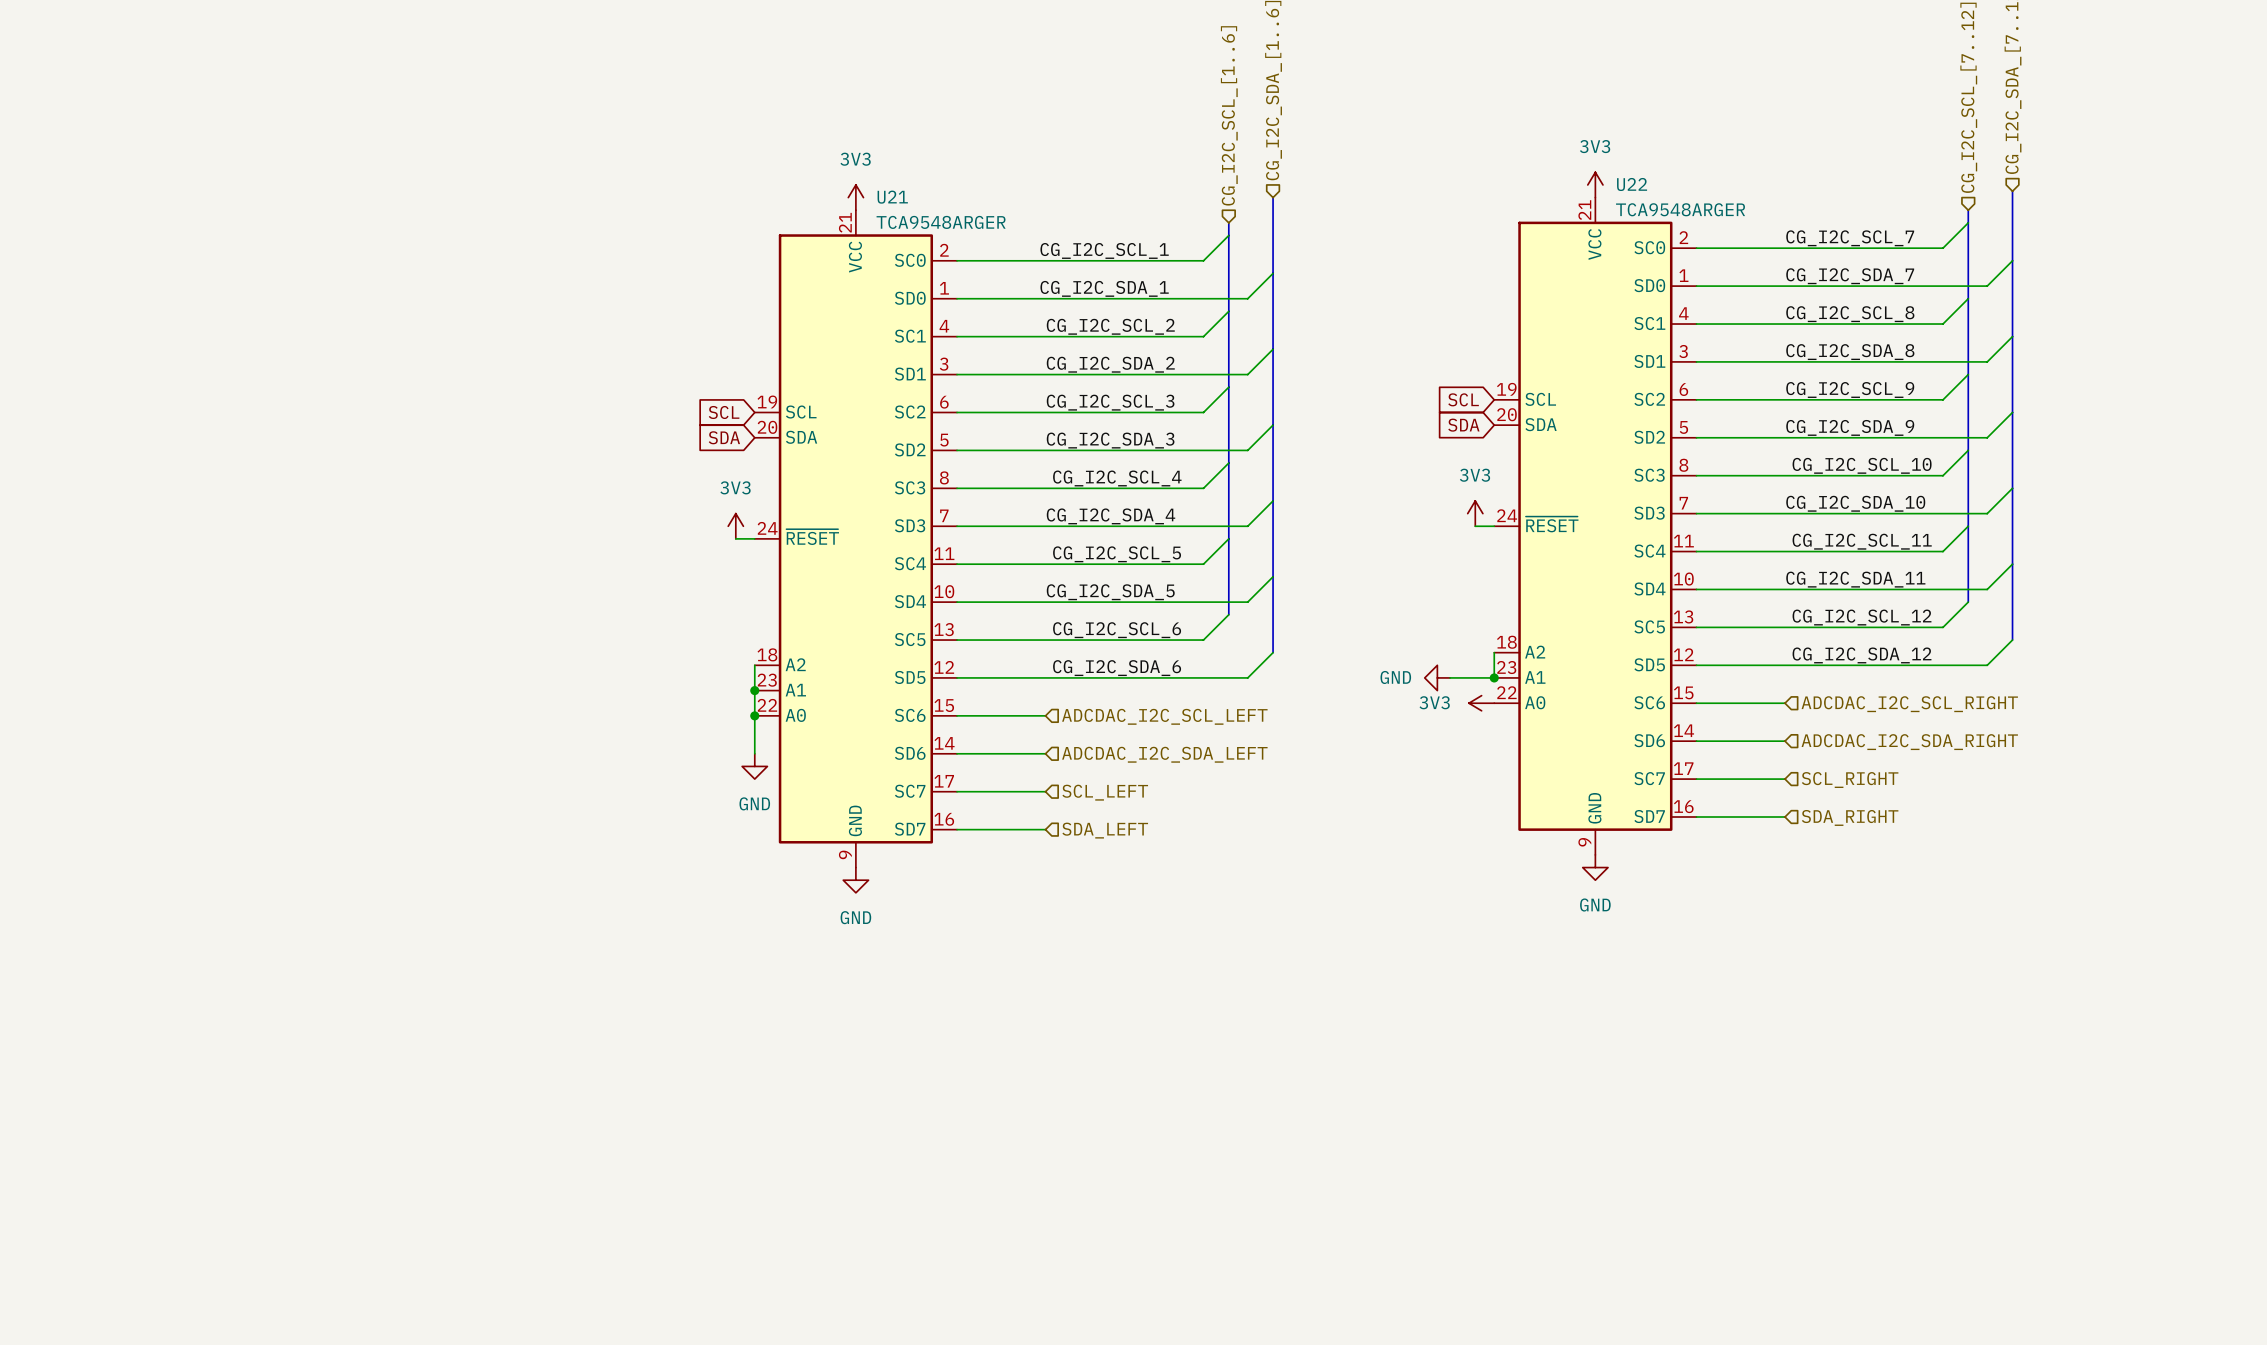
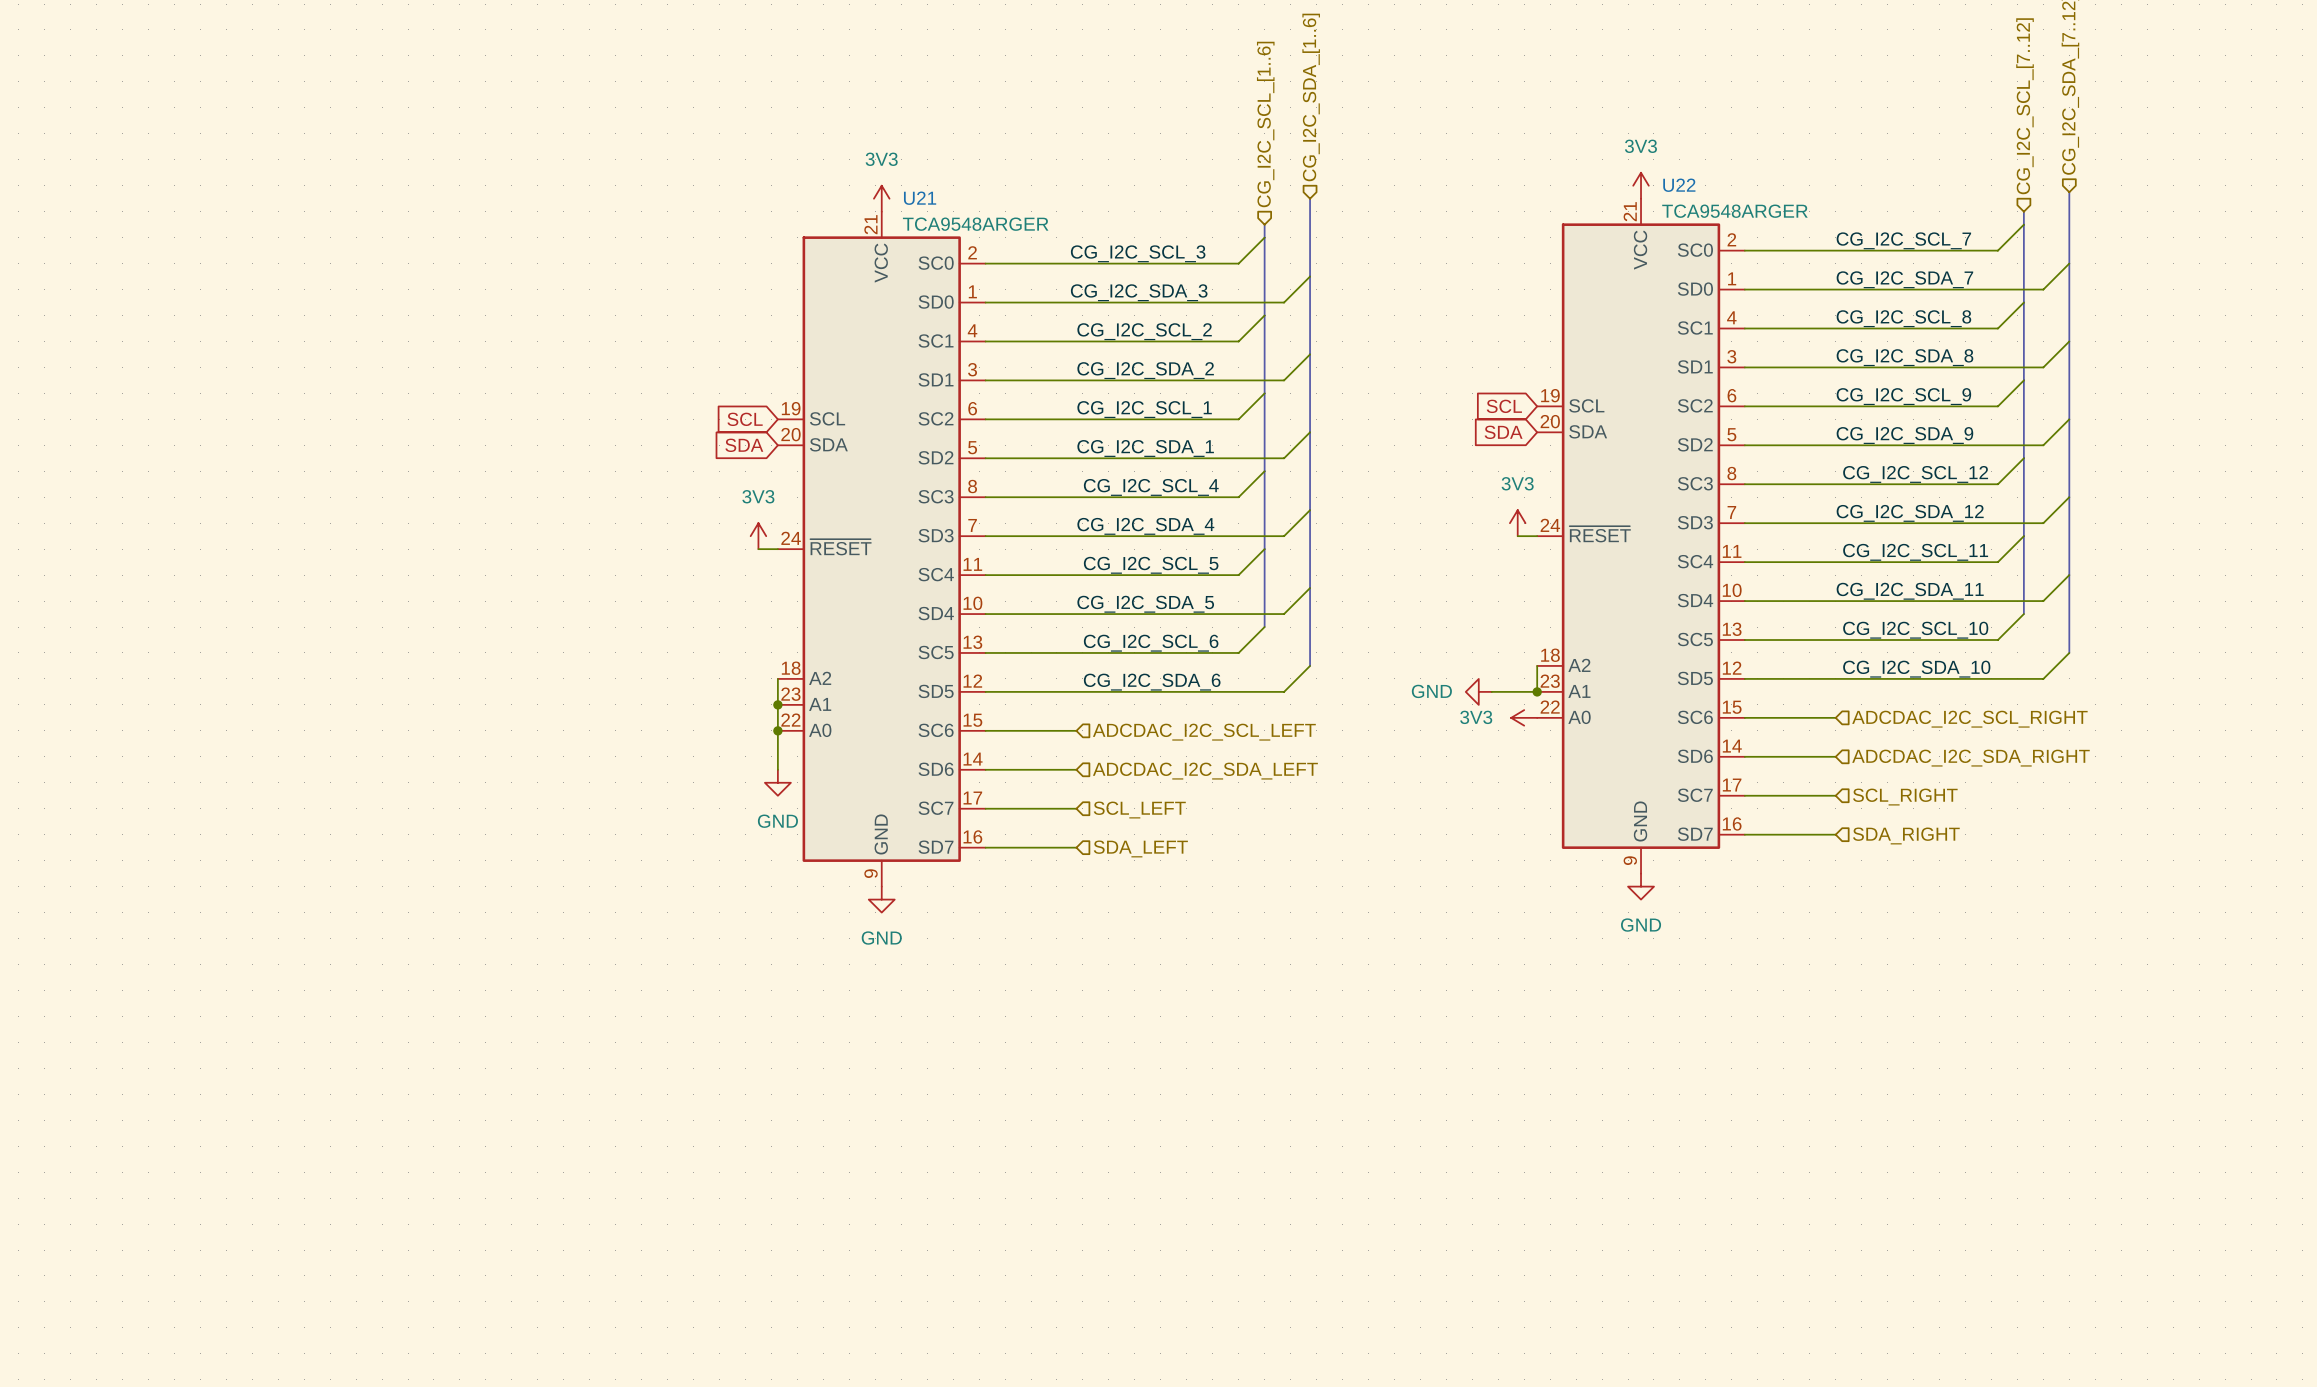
label: CG_I2C_SCL_1 (1104, 250) -> CG_I2C_SCL_3 (1138, 253)
label: CG_I2C_SDA_1 (1104, 288) -> CG_I2C_SDA_3 (1139, 292)
label: CG_I2C_SCL_3 (1110, 402) -> CG_I2C_SCL_1 (1144, 409)
label: CG_I2C_SDA_3 (1110, 440) -> CG_I2C_SDA_1 (1145, 448)
label: CG_I2C_SCL_10 (1862, 465) -> CG_I2C_SCL_12 (1915, 474)
label: CG_I2C_SDA_10 (1855, 503) -> CG_I2C_SDA_12 (1910, 513)
label: CG_I2C_SCL_12 (1862, 617) -> CG_I2C_SCL_10 (1915, 630)
label: CG_I2C_SDA_12 (1862, 655) -> CG_I2C_SDA_10 (1916, 669)

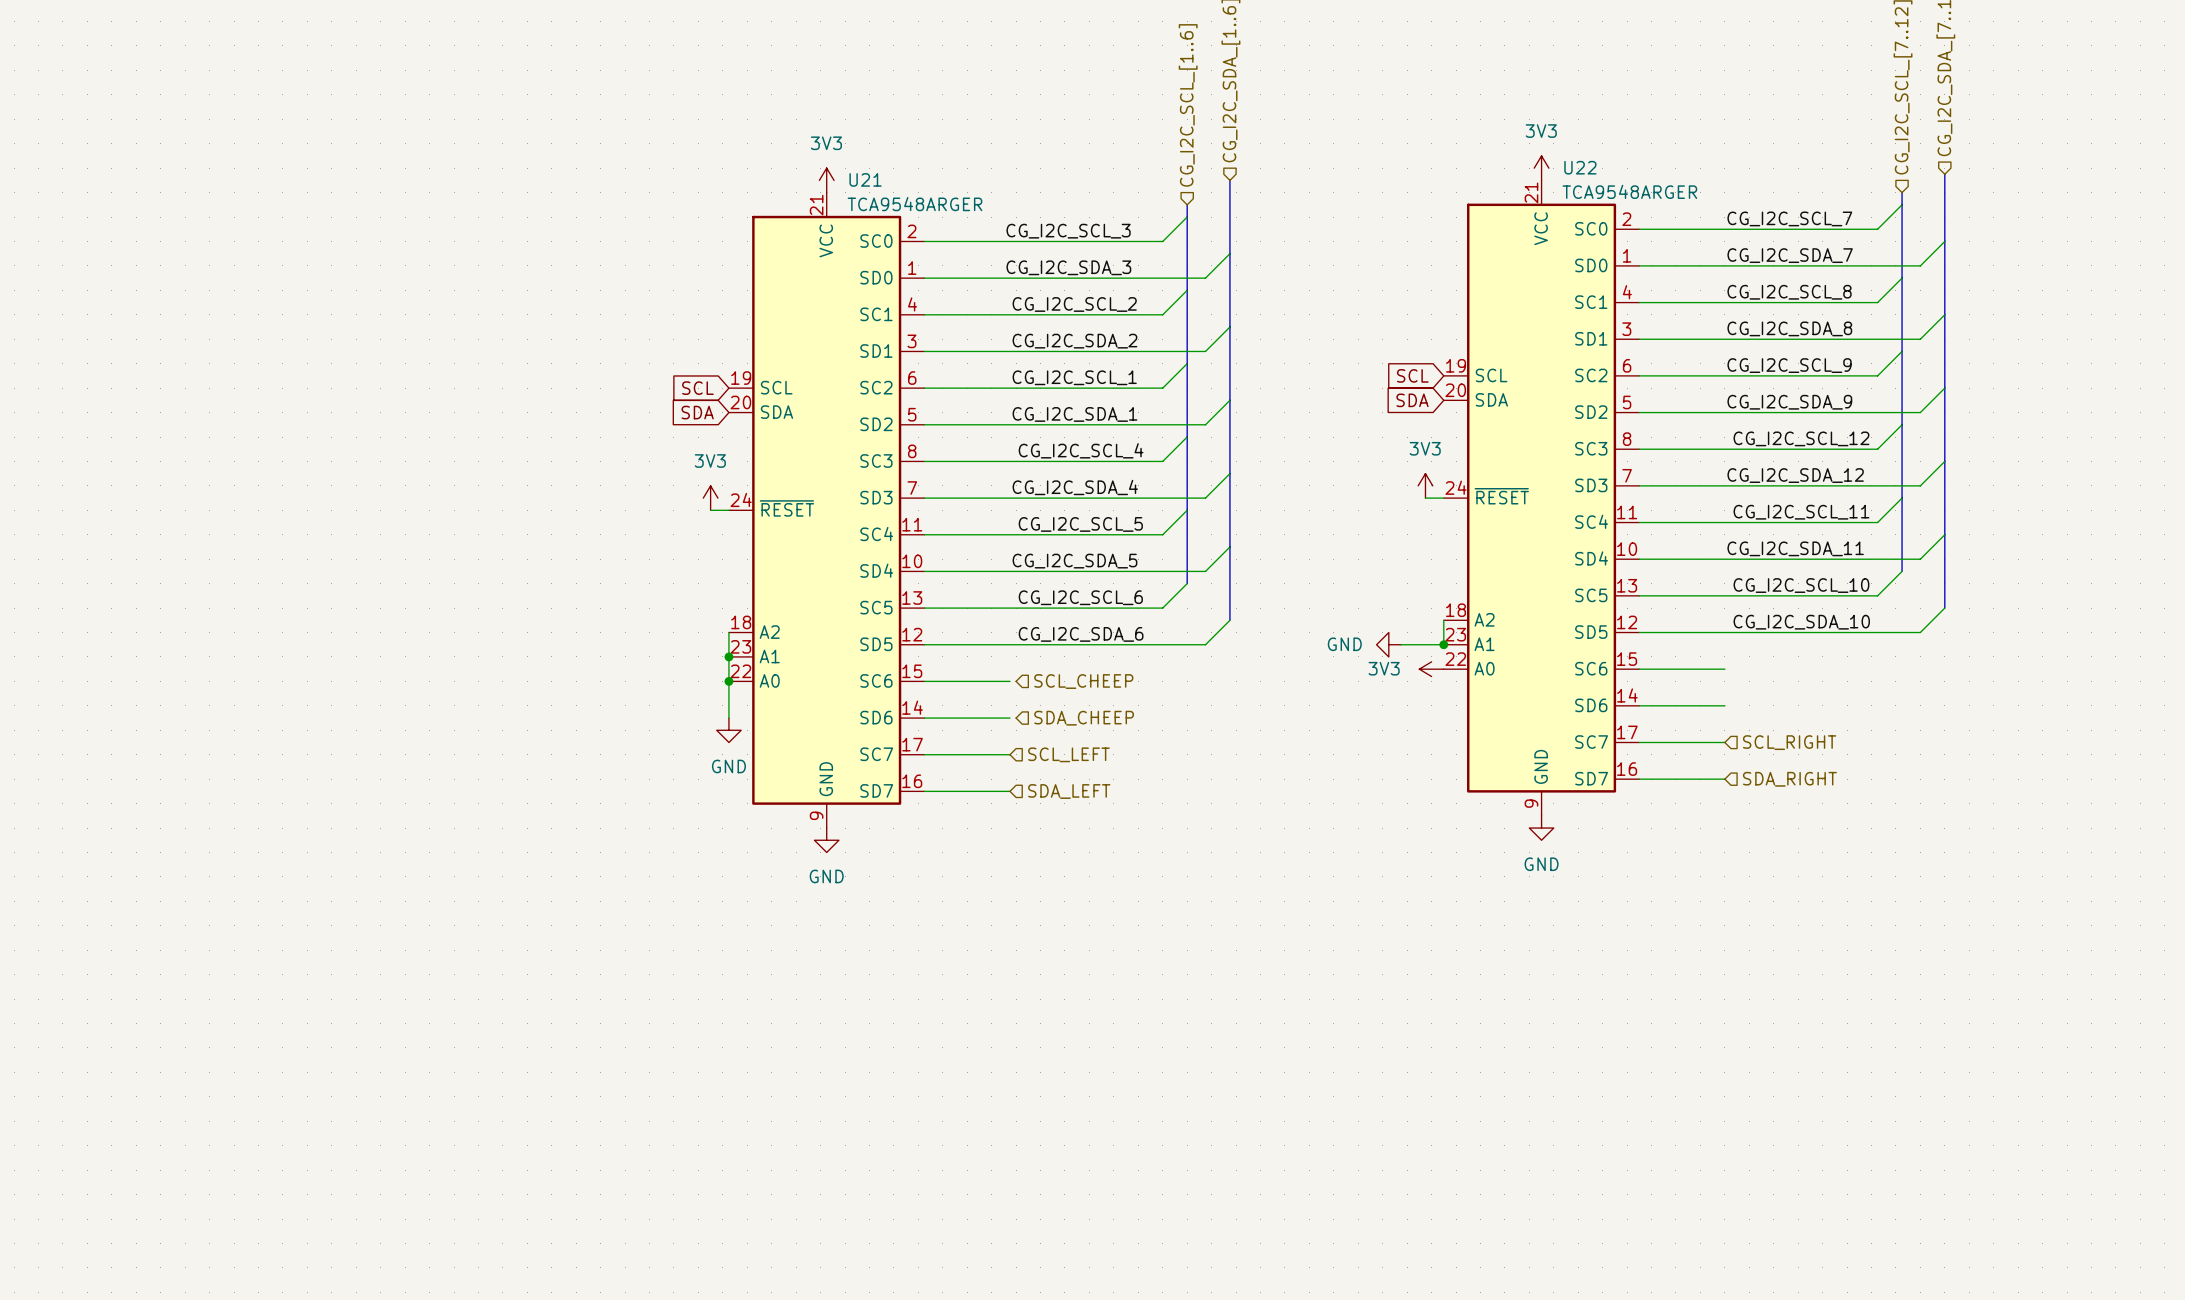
hierarchical label: ADCDAC_I2C_SCL_RIGHT (1969, 719) -> none
hierarchical label: ADCDAC_I2C_SCL_LEFT (1204, 732) -> SCL_CHEEP (1083, 681)
hierarchical label: ADCDAC_I2C_SDA_RIGHT (1970, 758) -> none
hierarchical label: ADCDAC_I2C_SDA_LEFT (1205, 771) -> SDA_CHEEP (1084, 718)

